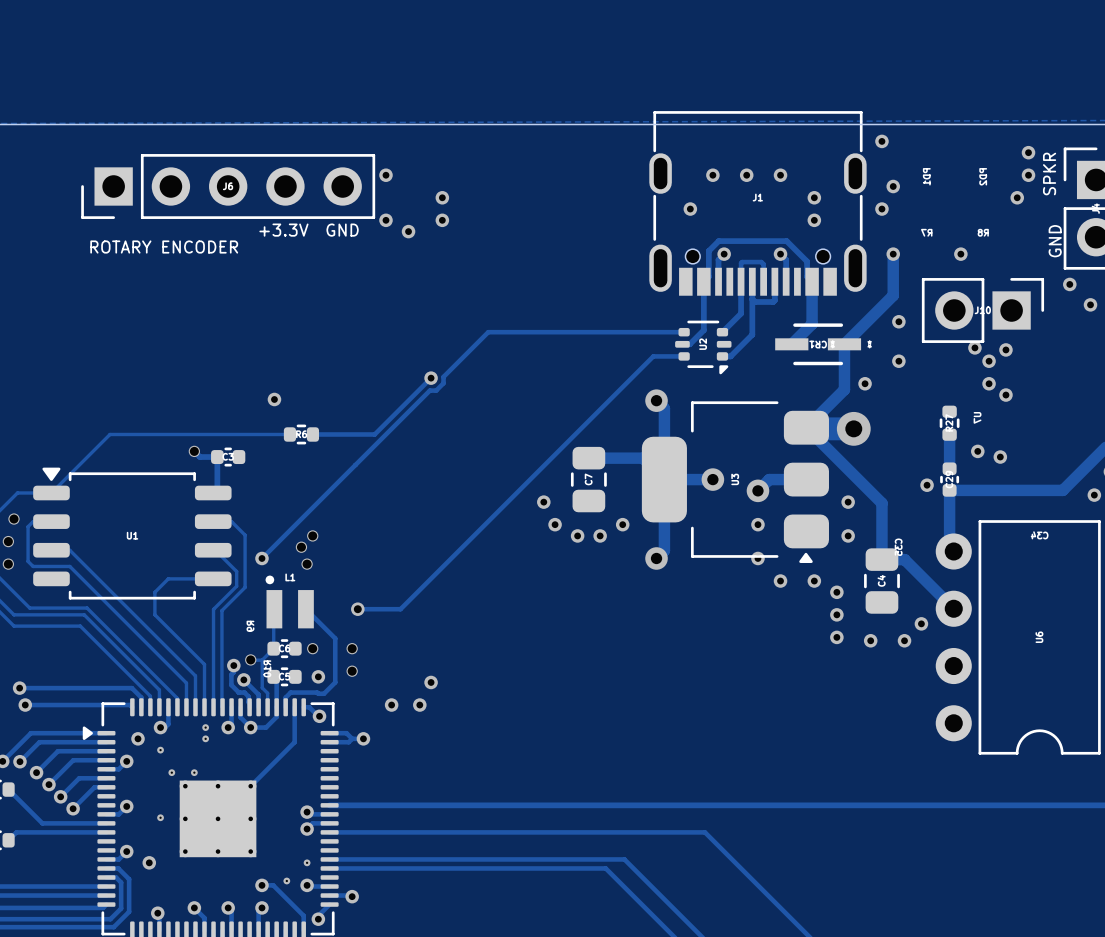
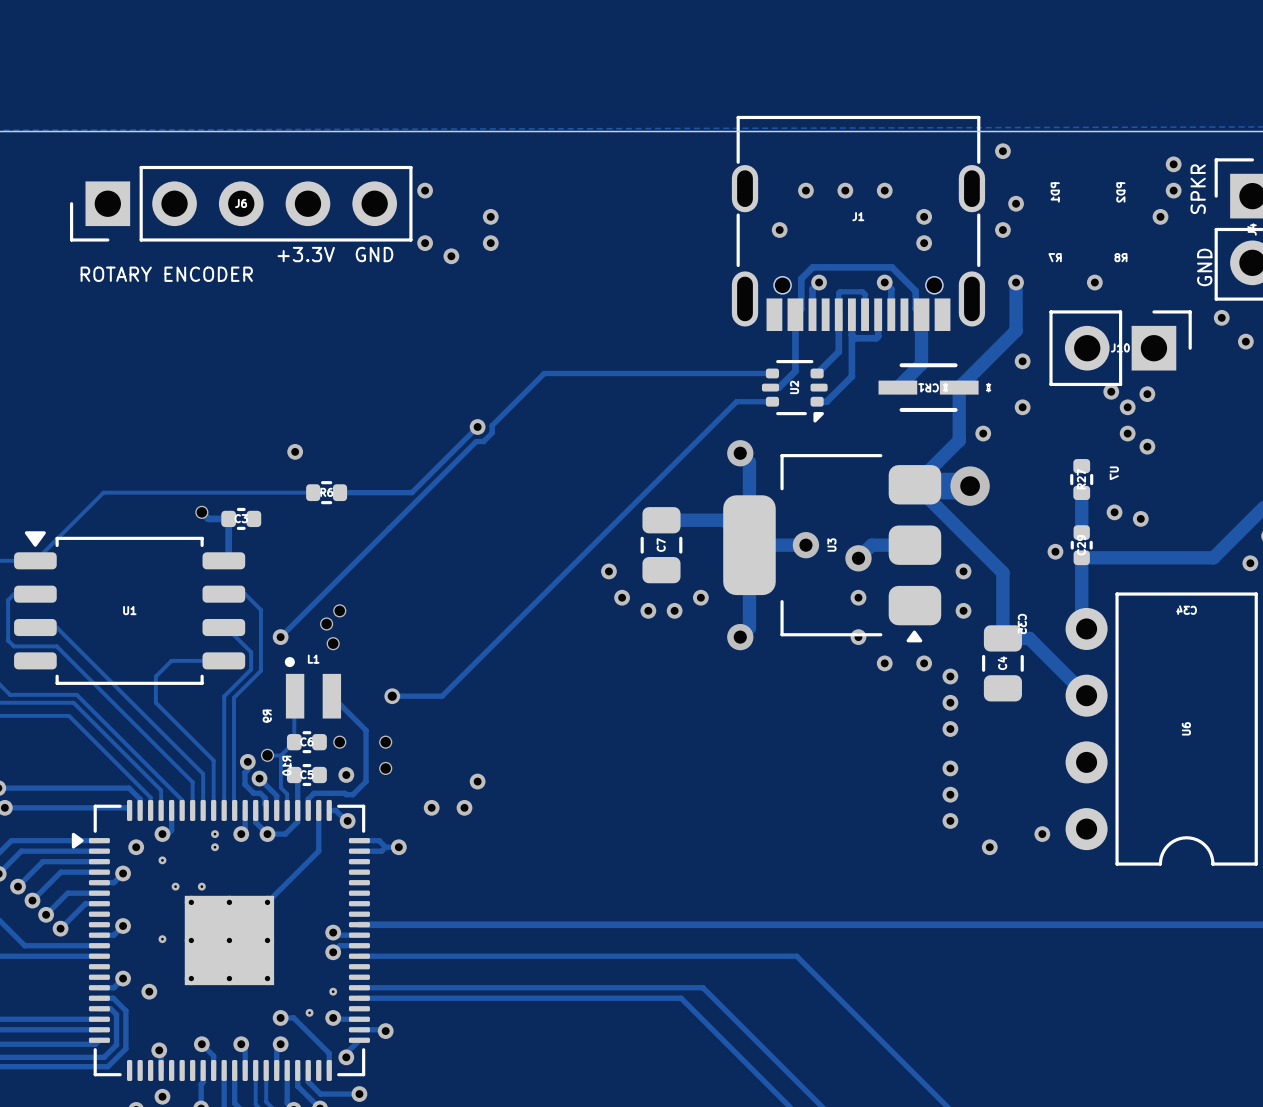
via: (921, 623) -> none
via: (870, 640) -> none
via: (904, 640) -> none
via: none -> (950, 768)
via: none -> (950, 794)
via: none -> (950, 820)
via: none -> (1042, 834)
via: none -> (989, 847)

